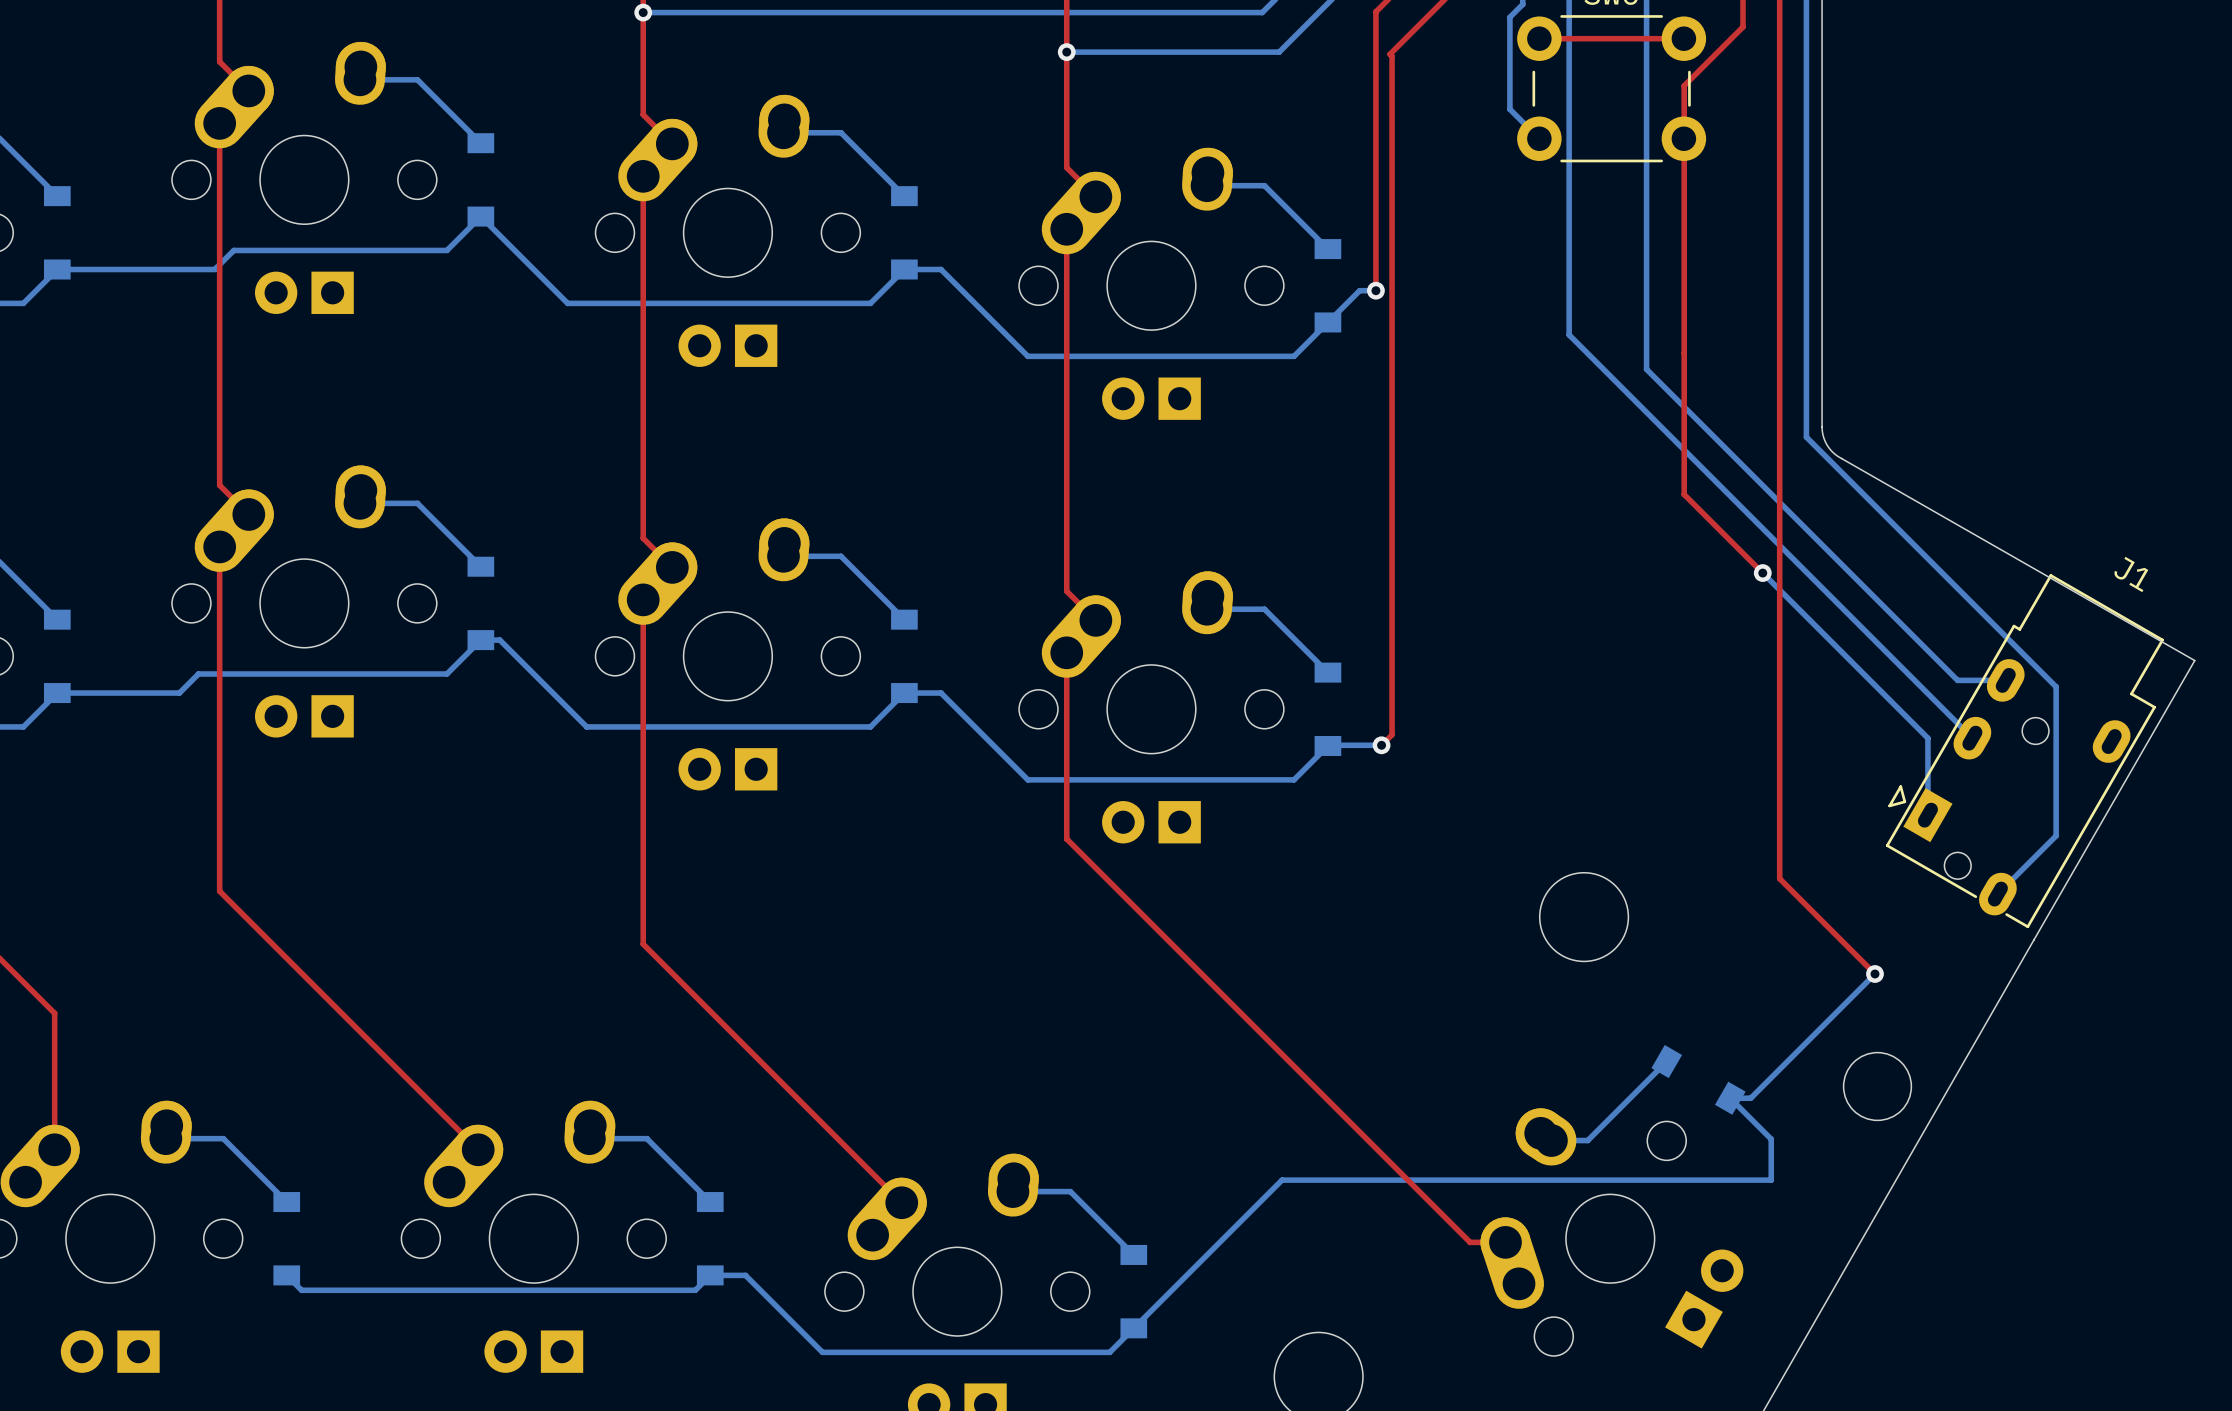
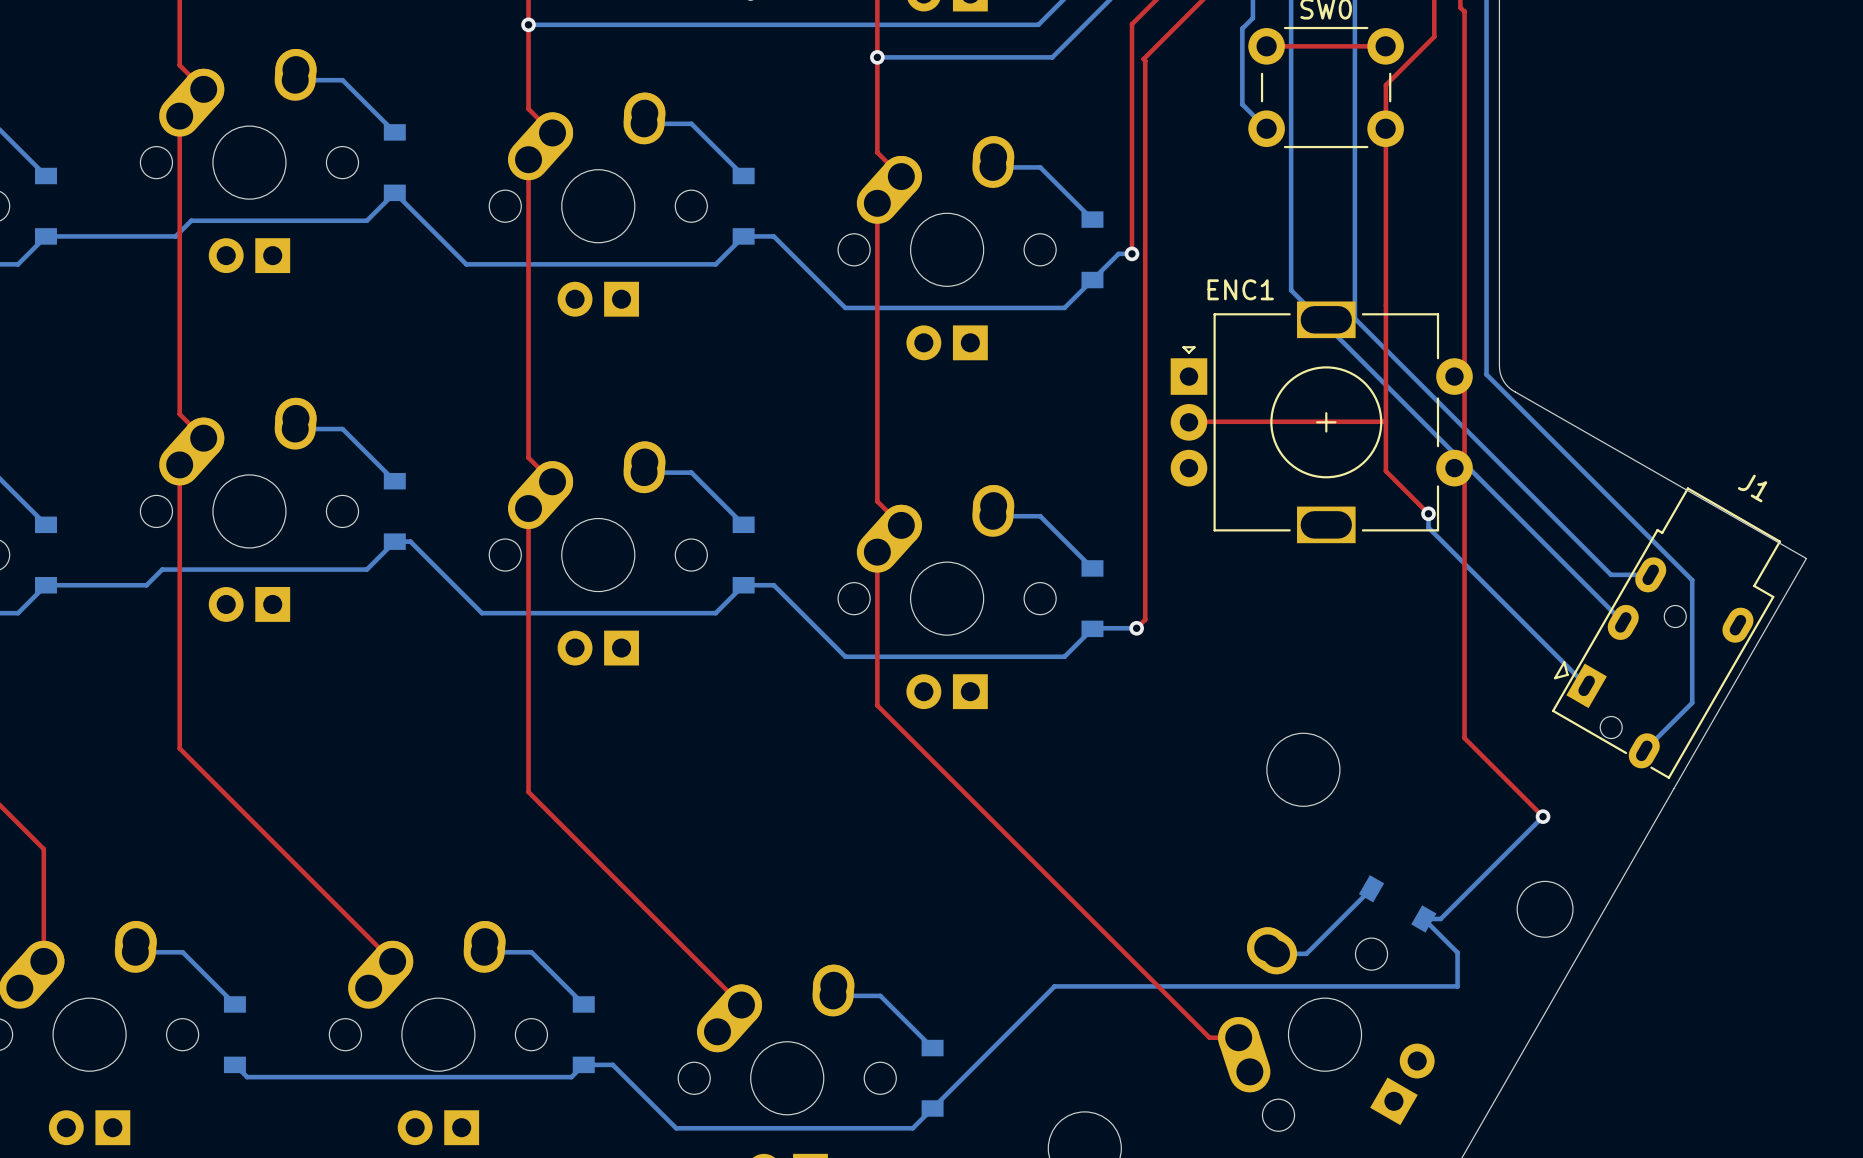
top track: (1684, 494) (1762, 573) -> none
top track: none -> (1188, 422) (1385, 421) (1385, 471) (1428, 513)
ENC1: none -> (1321, 422)
bottom track: (1762, 573) (1927, 738) (1927, 815) -> (1428, 513) (1428, 527) (1586, 685)
via position: (1762, 573) -> (1428, 513)

